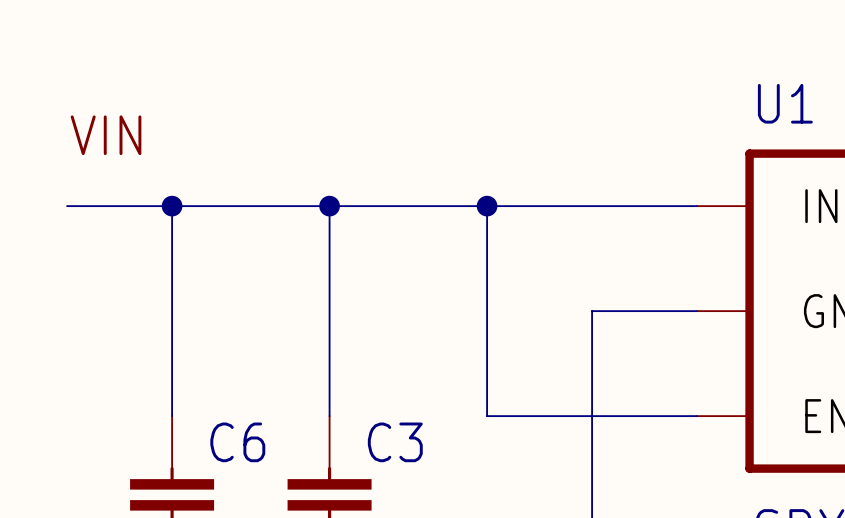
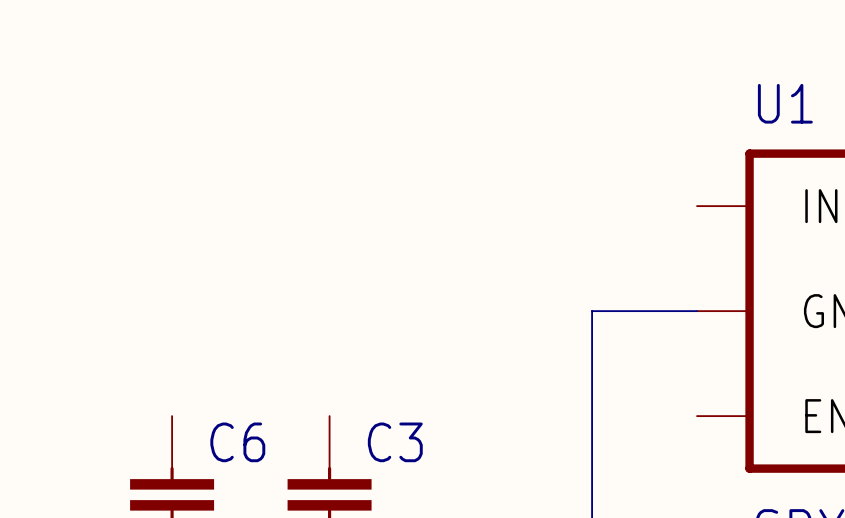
label: VIN (106, 135) -> none
wire: (67, 206) (697, 206) -> none
wire: (172, 206) (172, 416) -> none
junction: (172, 206) -> none
wire: (329, 206) (329, 416) -> none
junction: (329, 206) -> none
wire: (487, 206) (487, 416) (697, 416) -> none
junction: (487, 206) -> none

